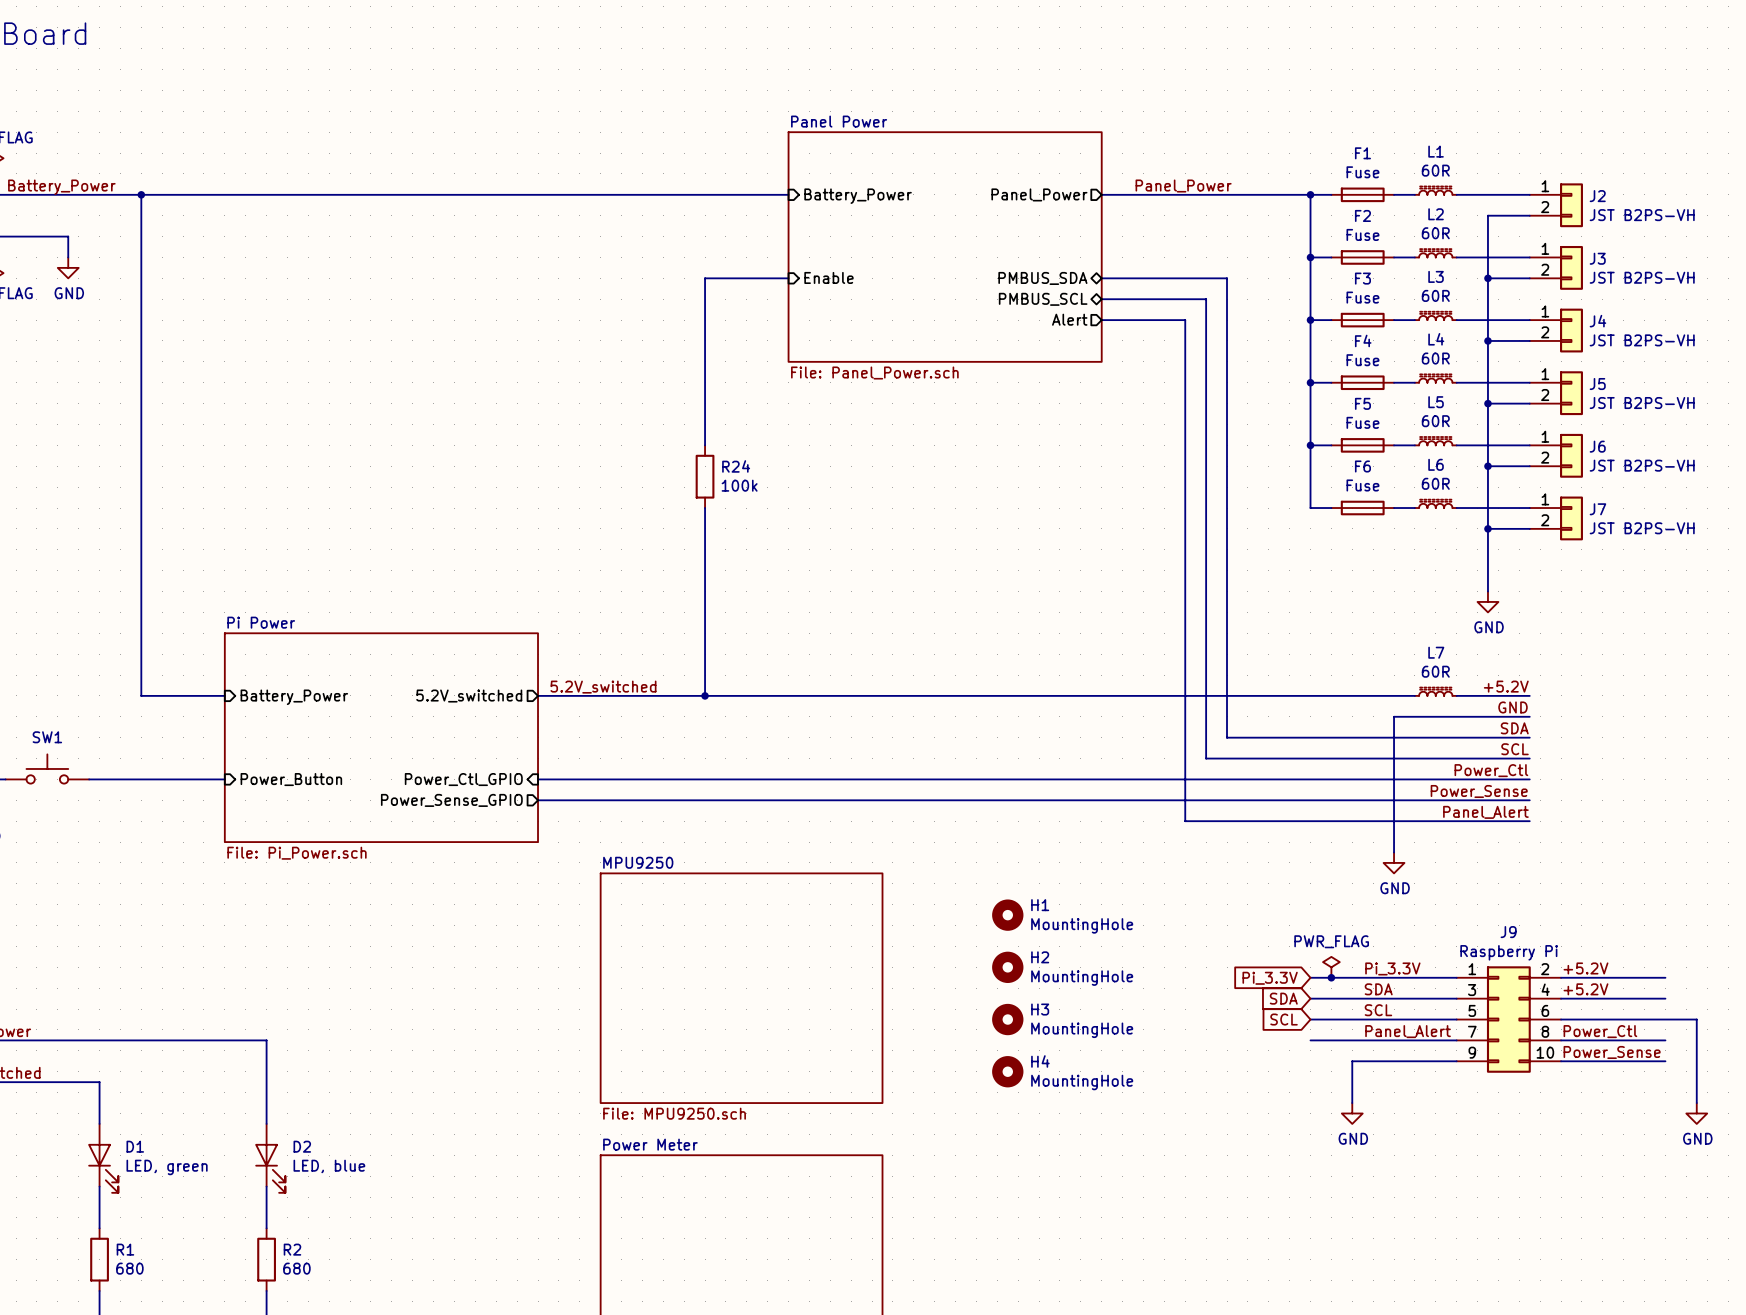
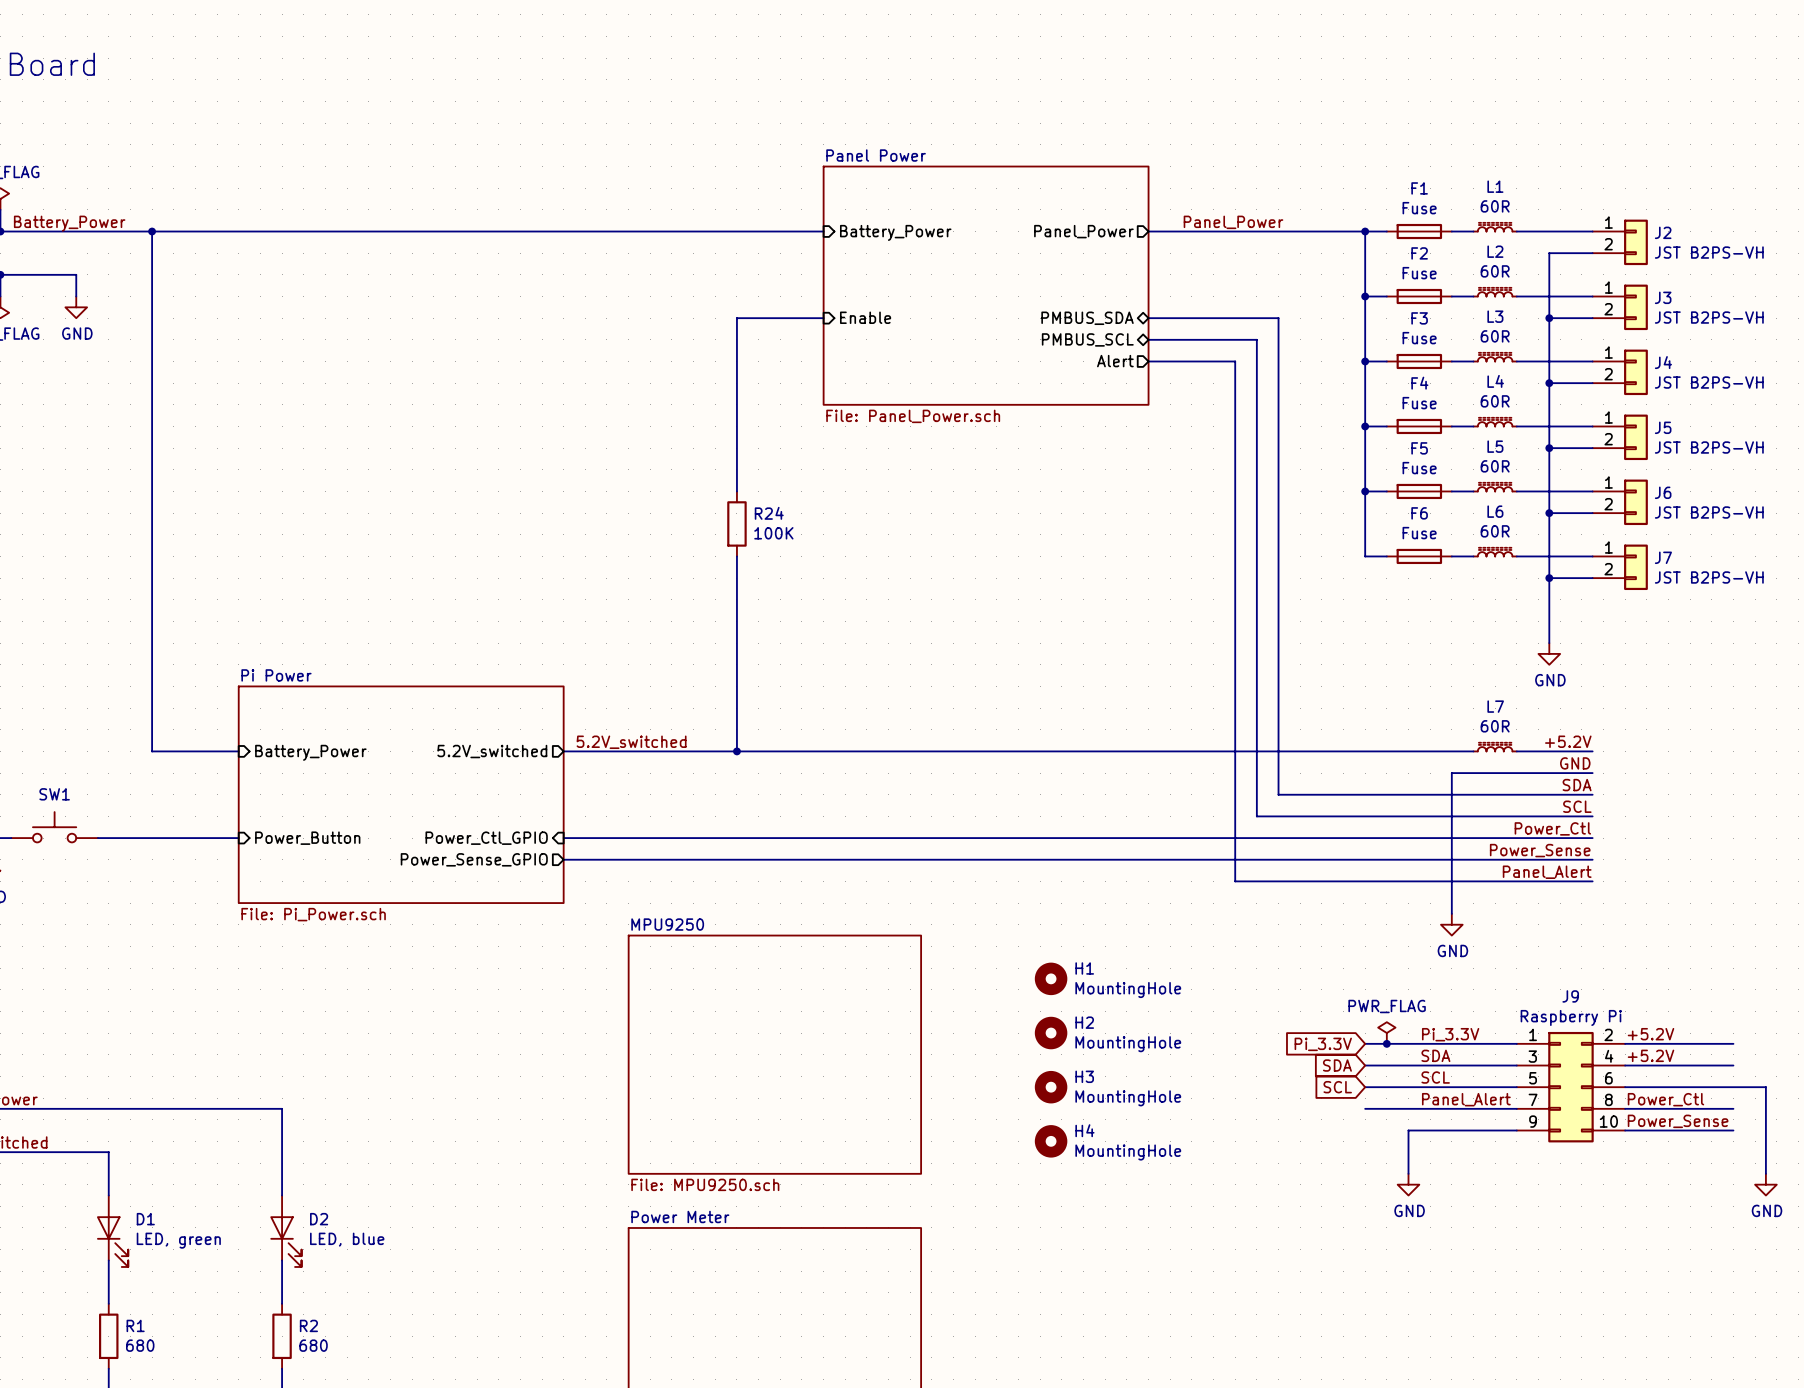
R24 value: 100k (739, 485) -> 100K (773, 533)

